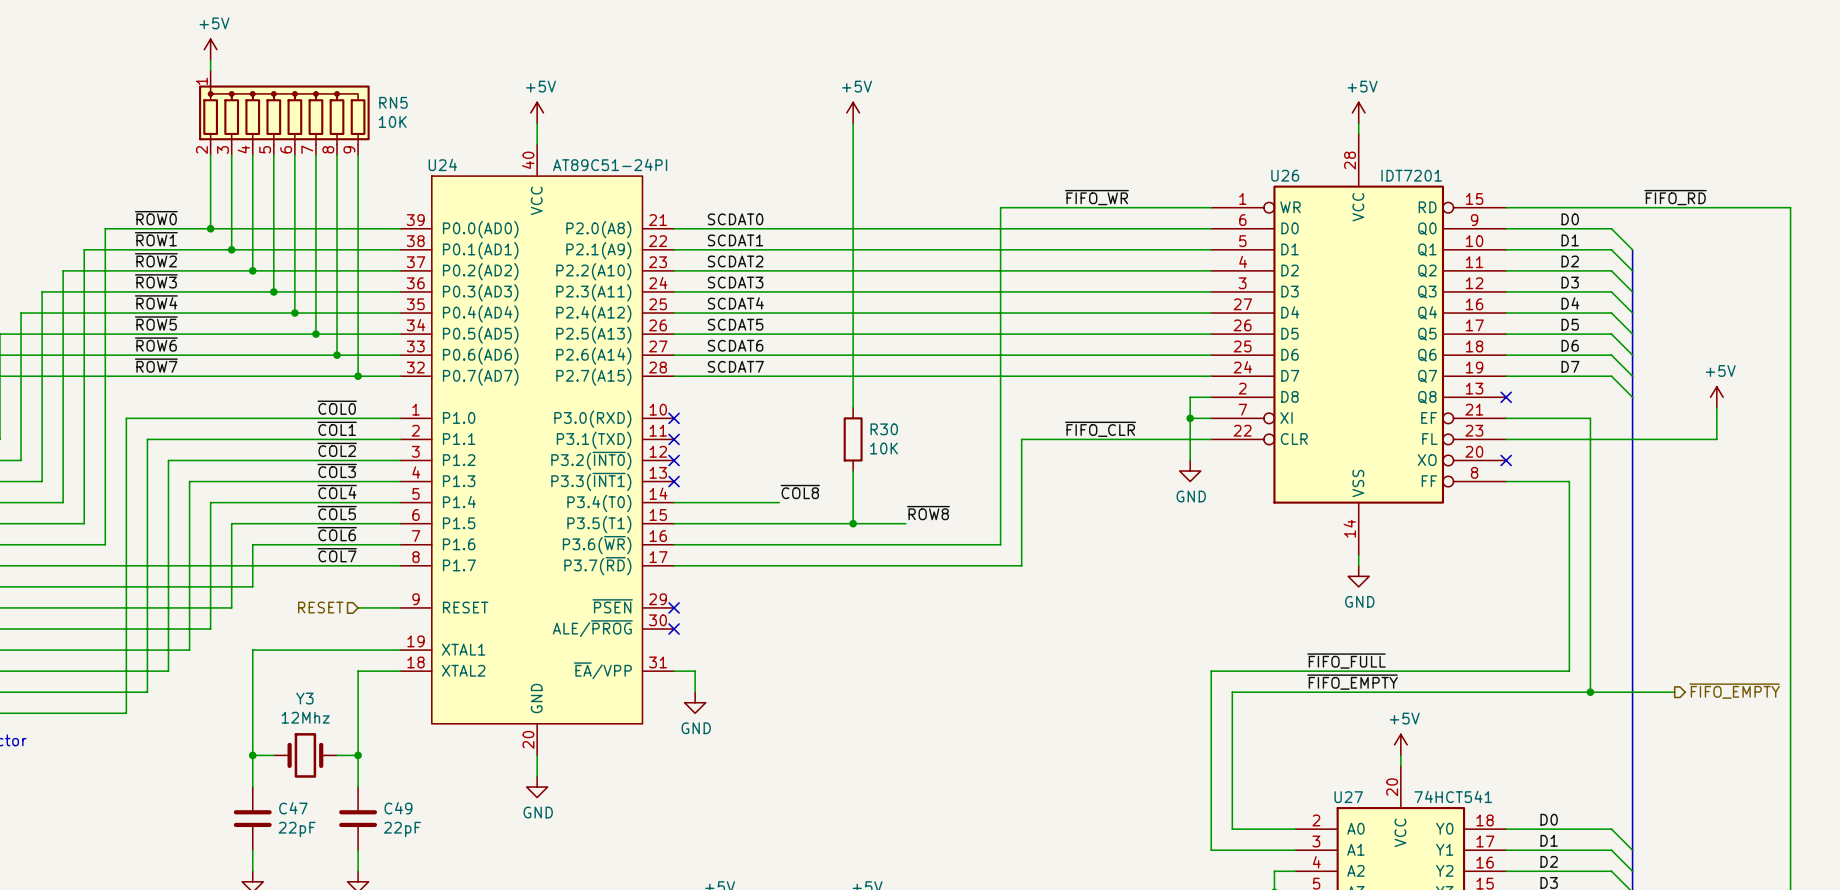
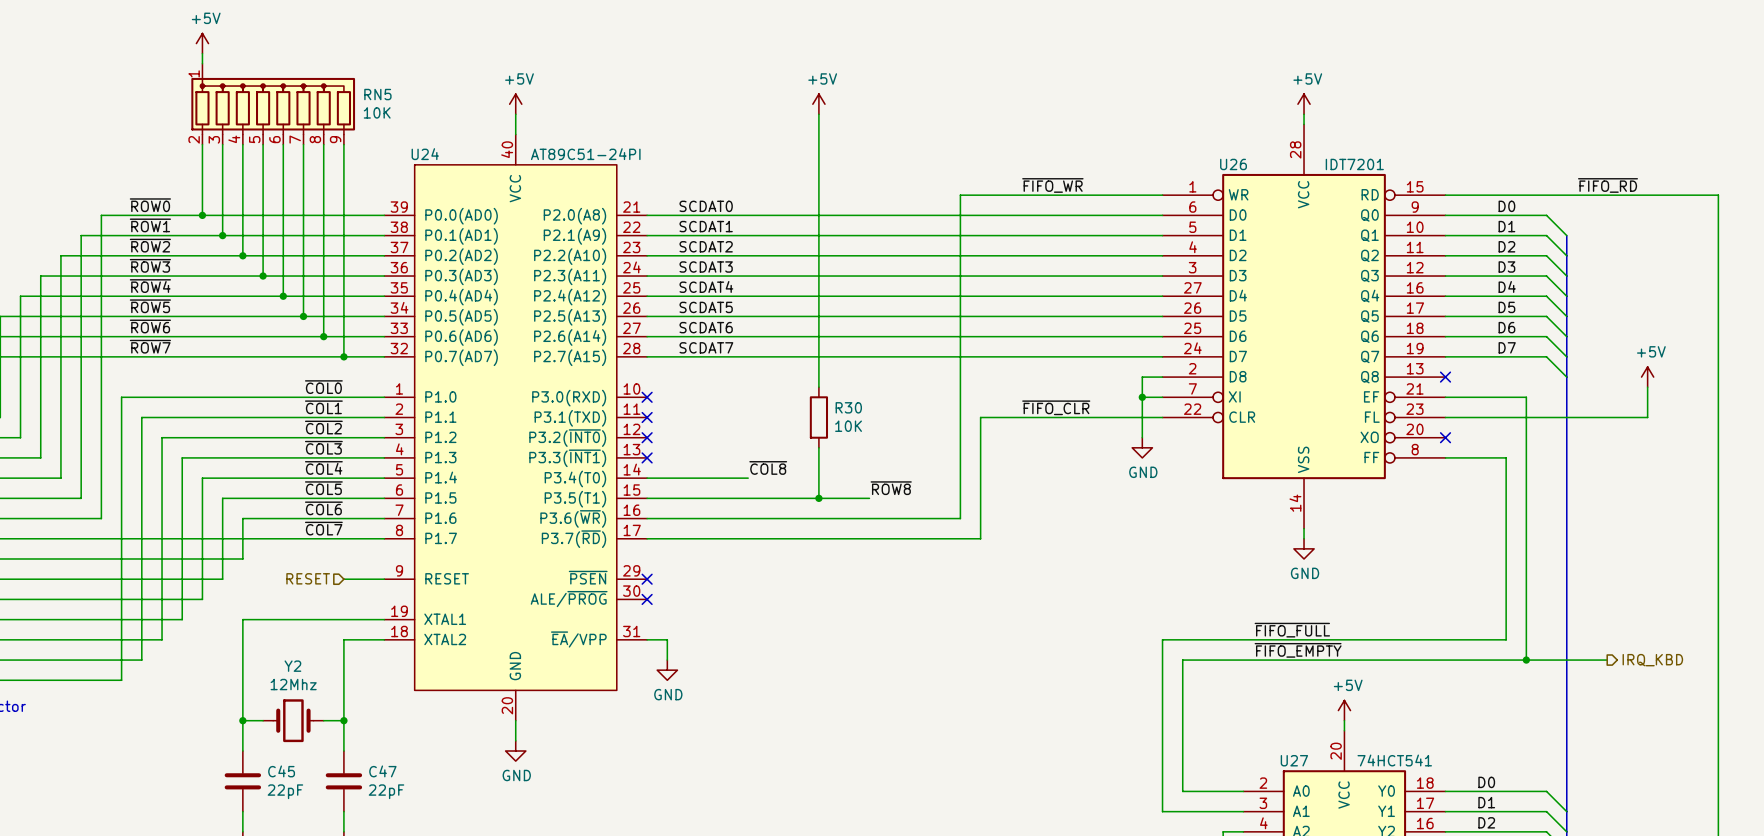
hierarchical label: ~{FIFO_EMPTY} (1734, 691) -> IRQ_KBD (1652, 660)
Y3 name: Y3 (304, 698) -> Y2 (292, 666)
C47 name: C47 (293, 808) -> C45 (281, 771)
C49 name: C49 (398, 808) -> C47 (382, 771)

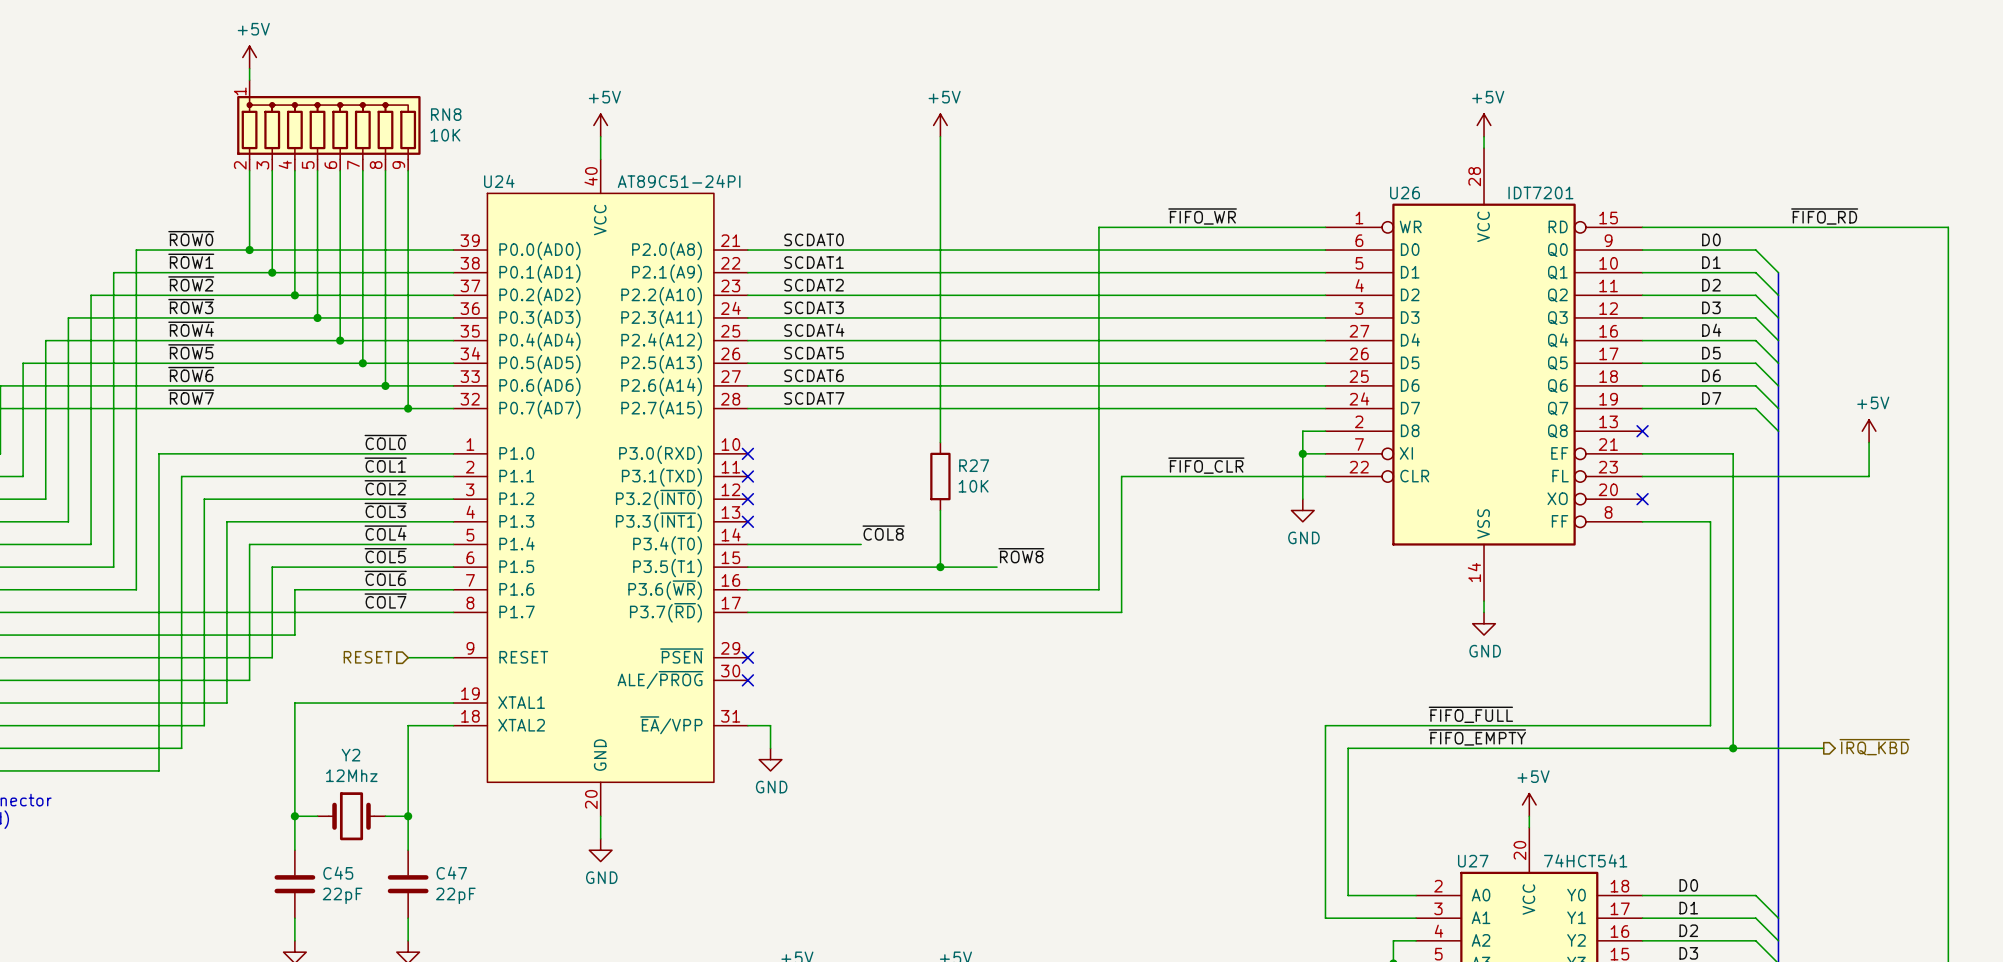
RN5 name: RN5 (377, 94) -> RN8 (446, 114)
R30 name: R30 (848, 407) -> R27 (974, 465)
hierarchical label: IRQ_KBD (1652, 660) -> ~{IRQ_KBD} (1874, 747)

